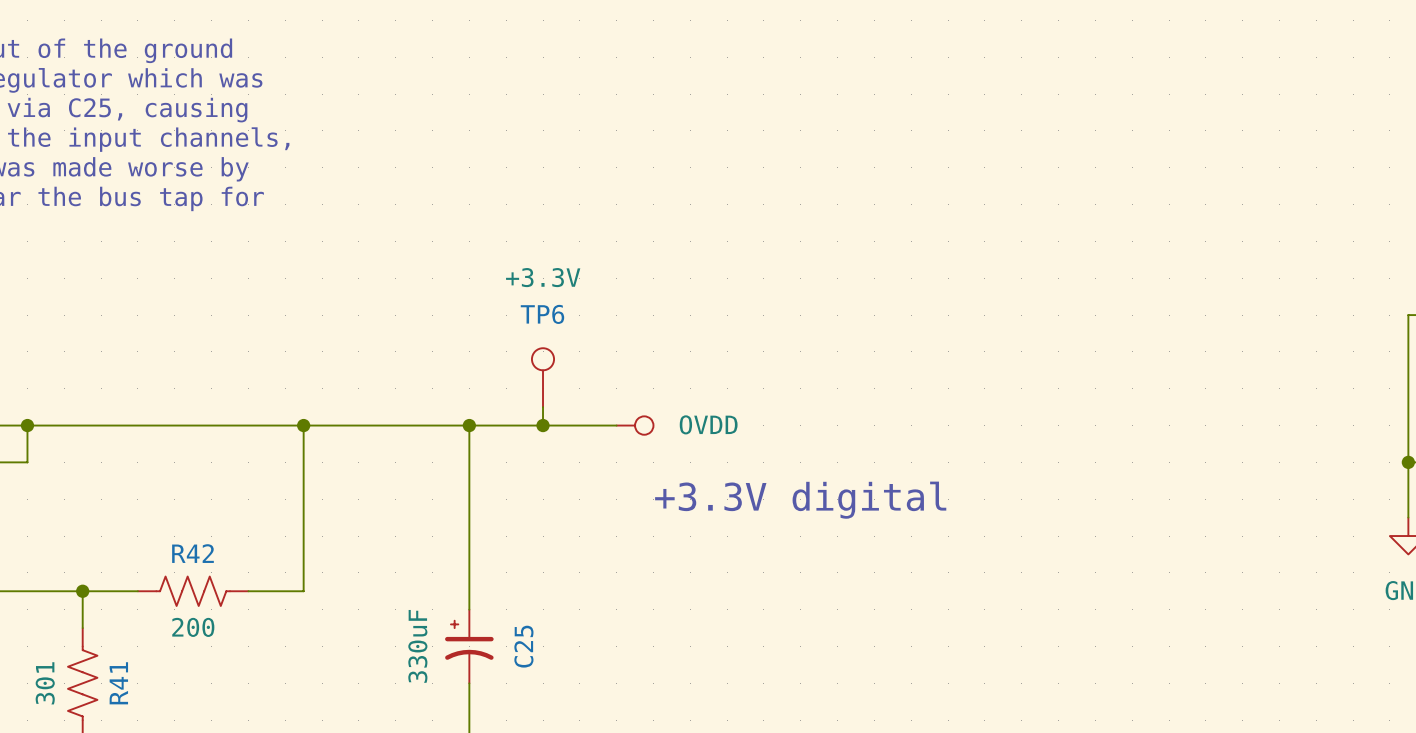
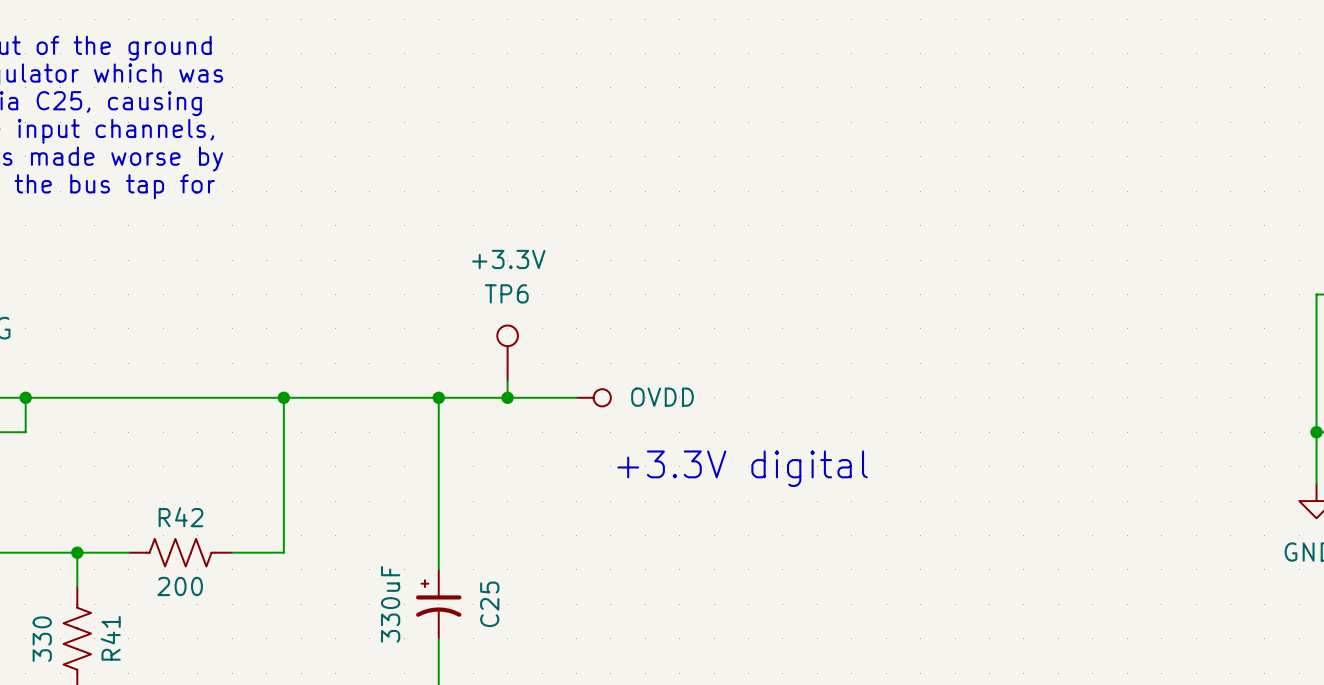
R41 value: 301 (45, 683) -> 330 (42, 639)

